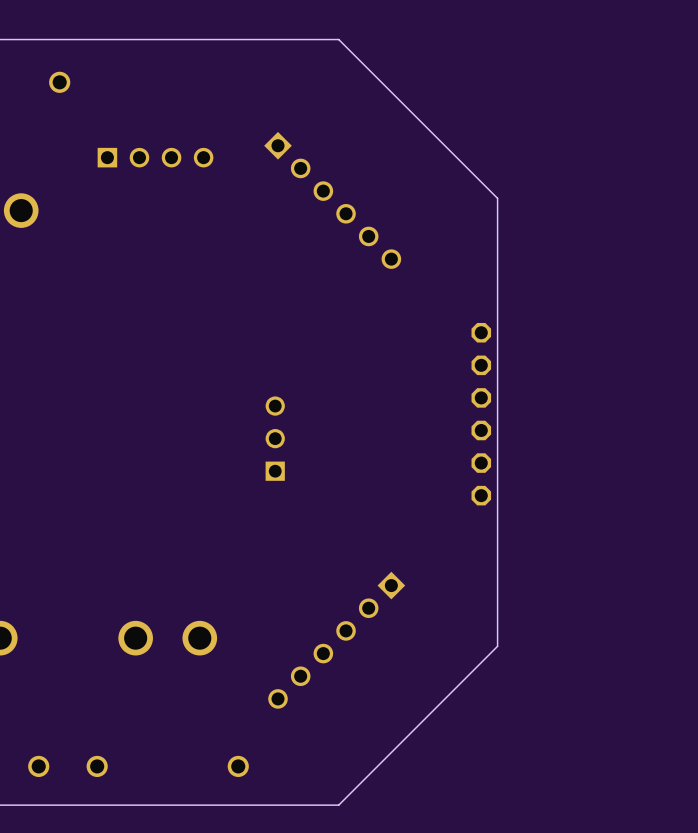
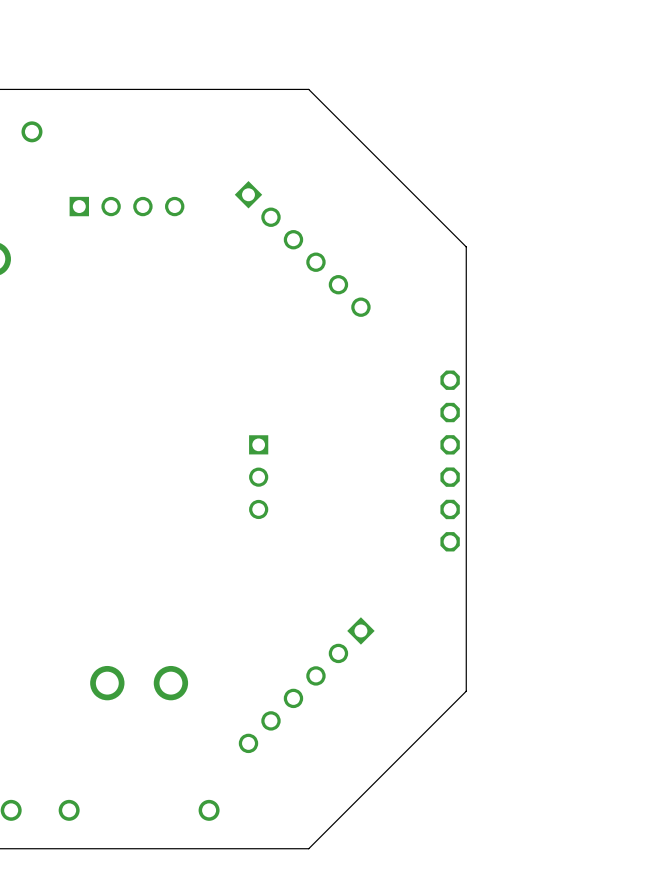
part rotation: 0° (275, 438) -> 180° (258, 477)

